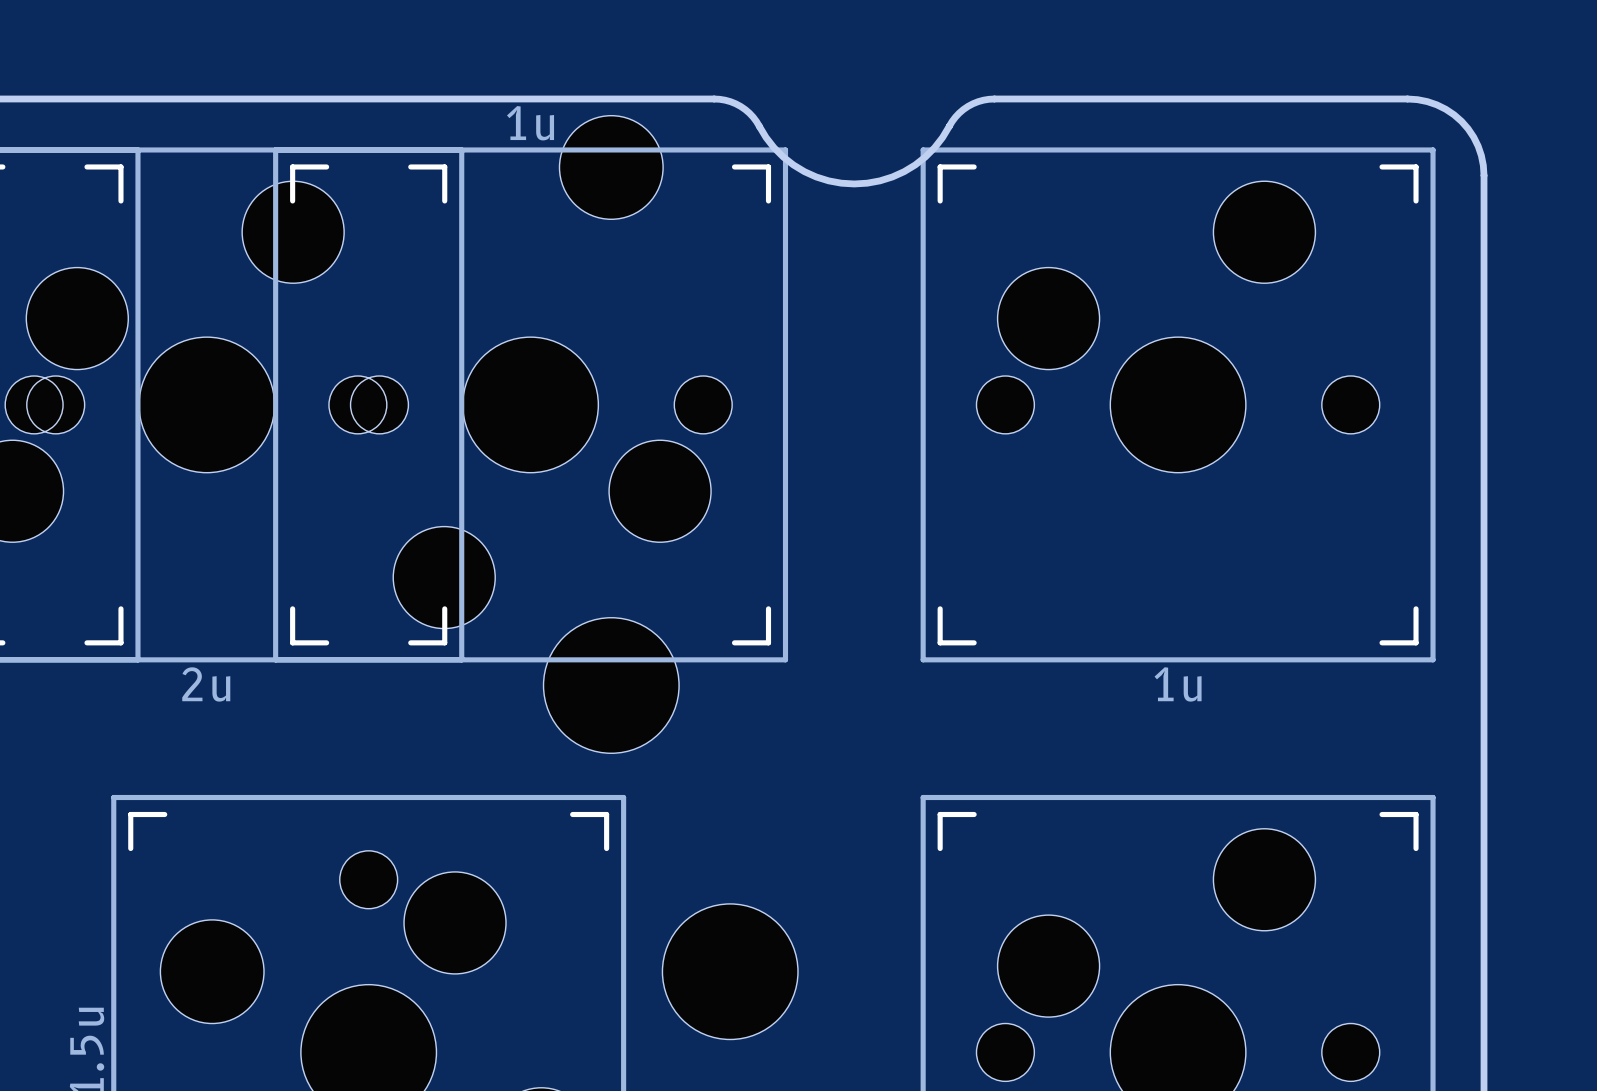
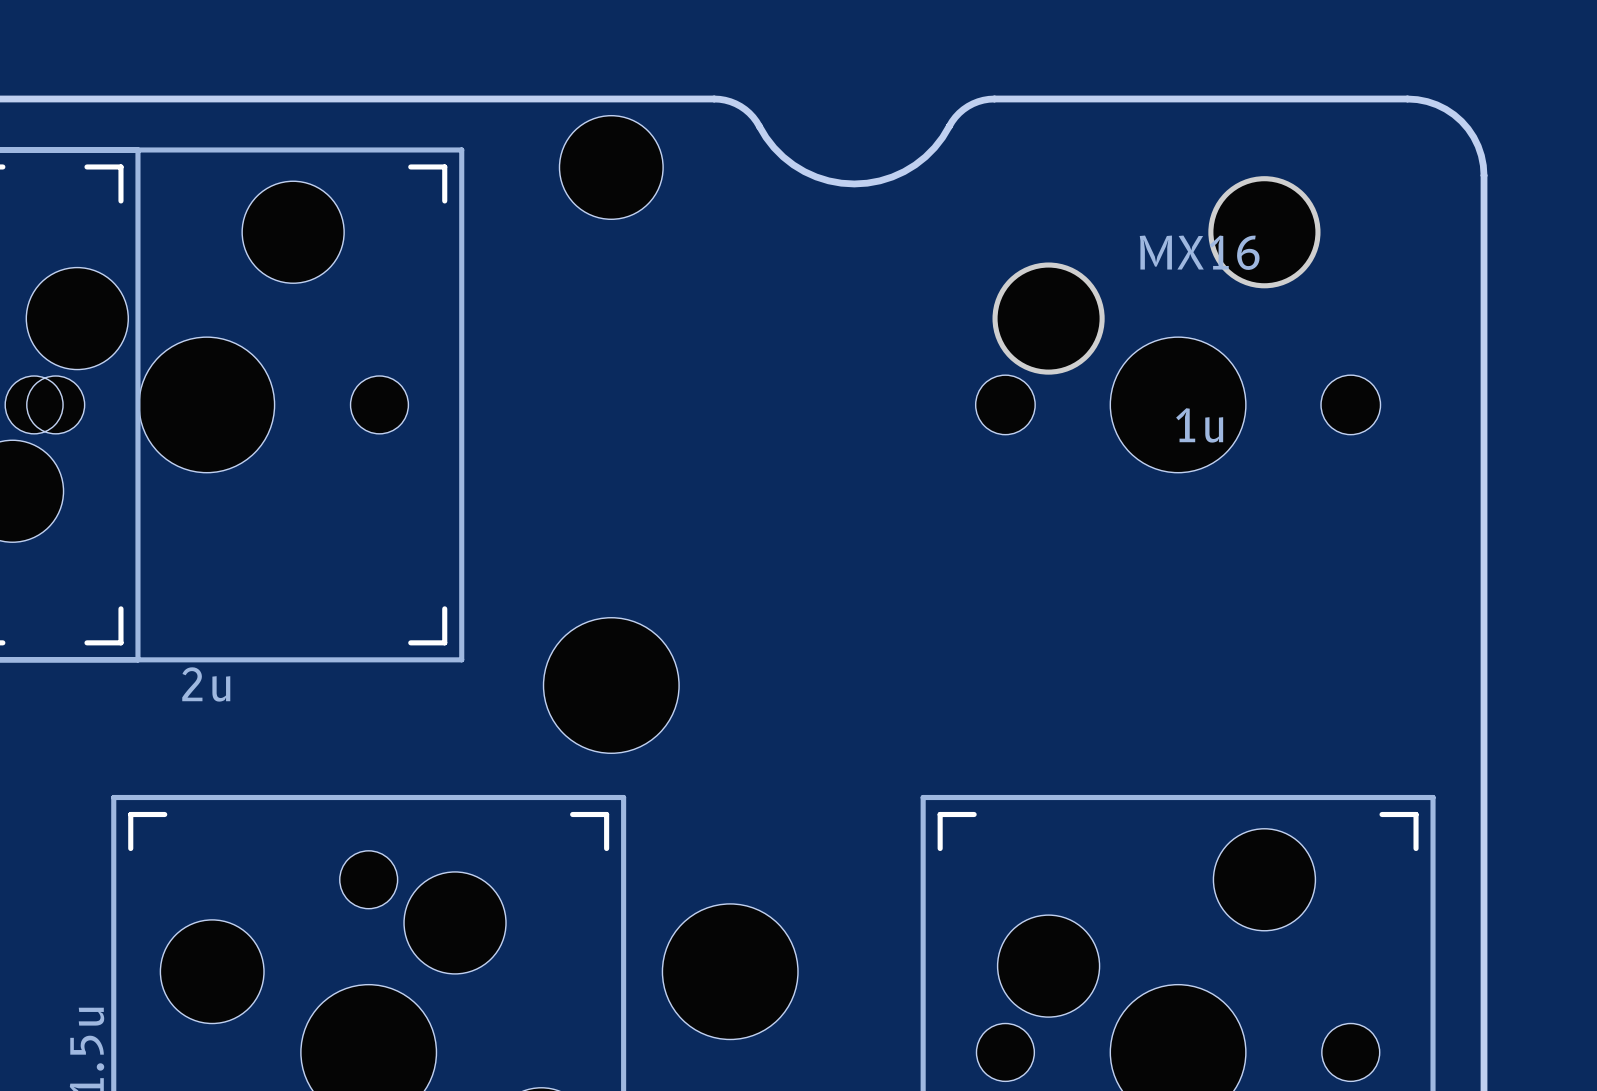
MX16: none -> 1u (1178, 324)
part: 1u (530, 404) -> none
part: 1u (1178, 404) -> none

